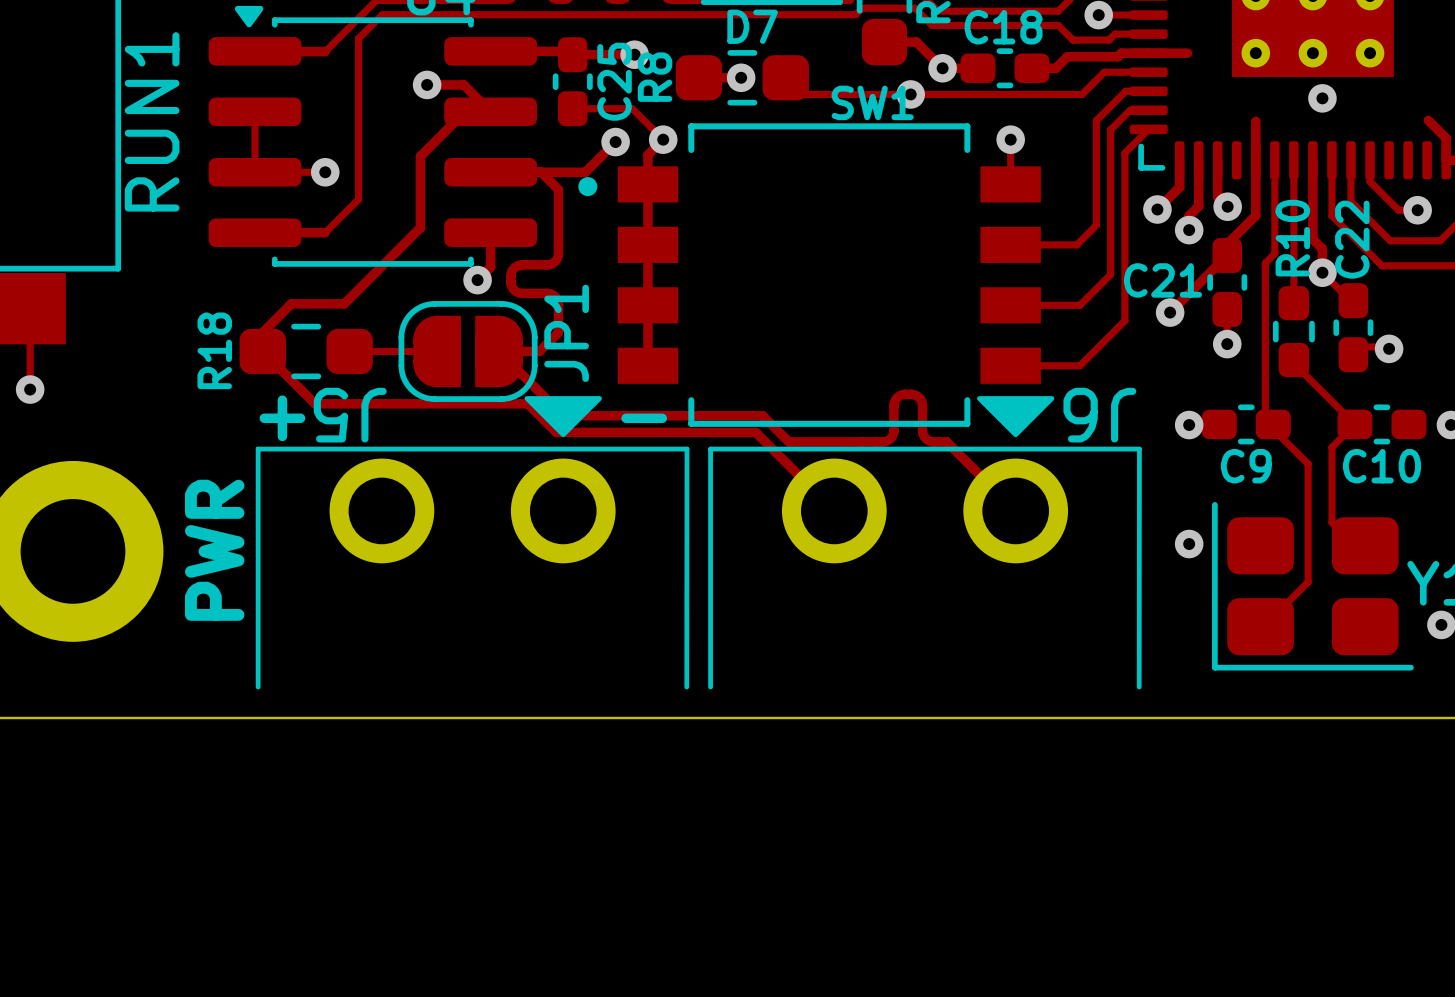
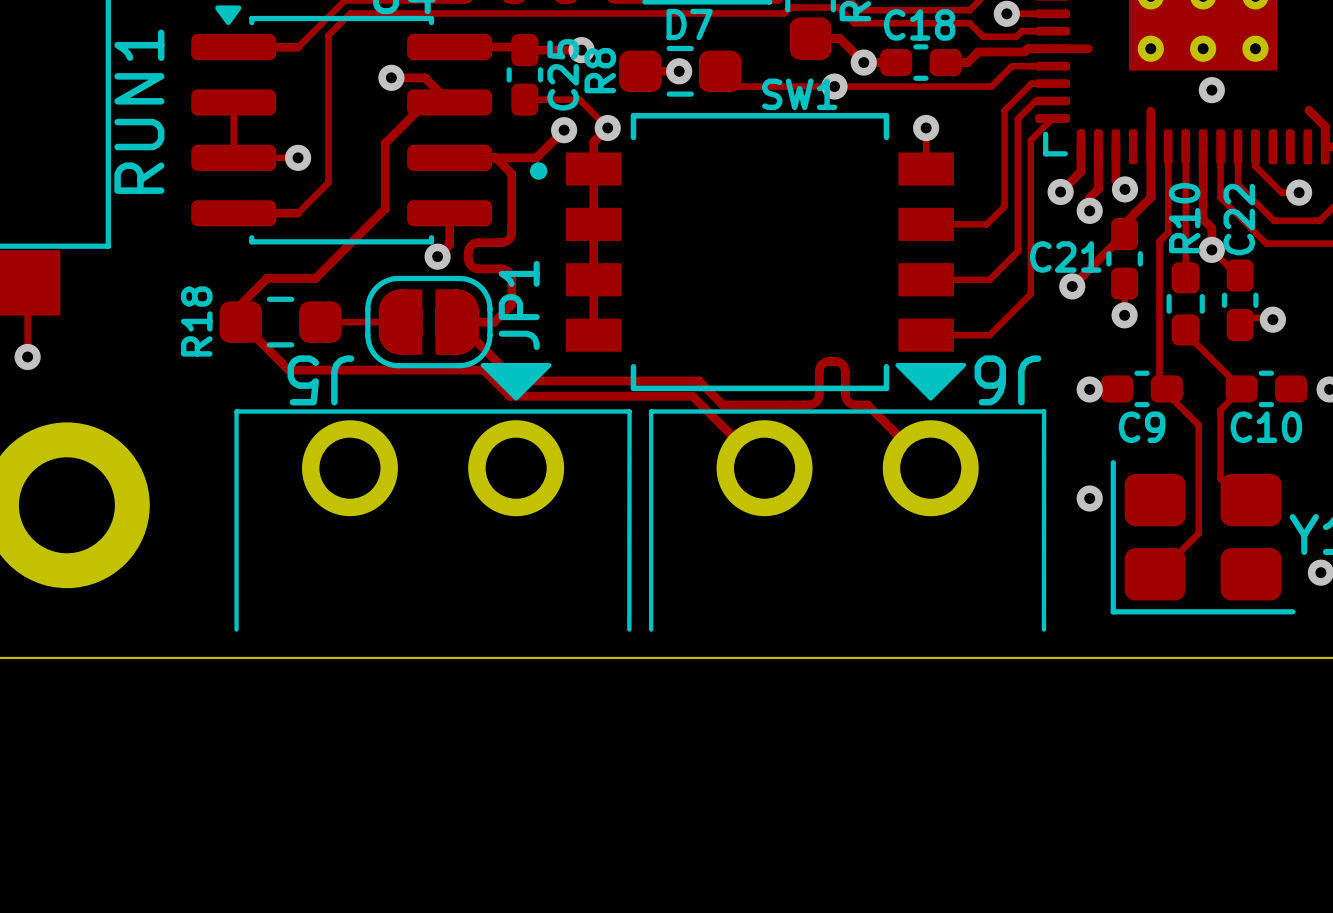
text: + (282, 418) -> none
text: - (644, 418) -> none
text: PWR (214, 550) -> none

